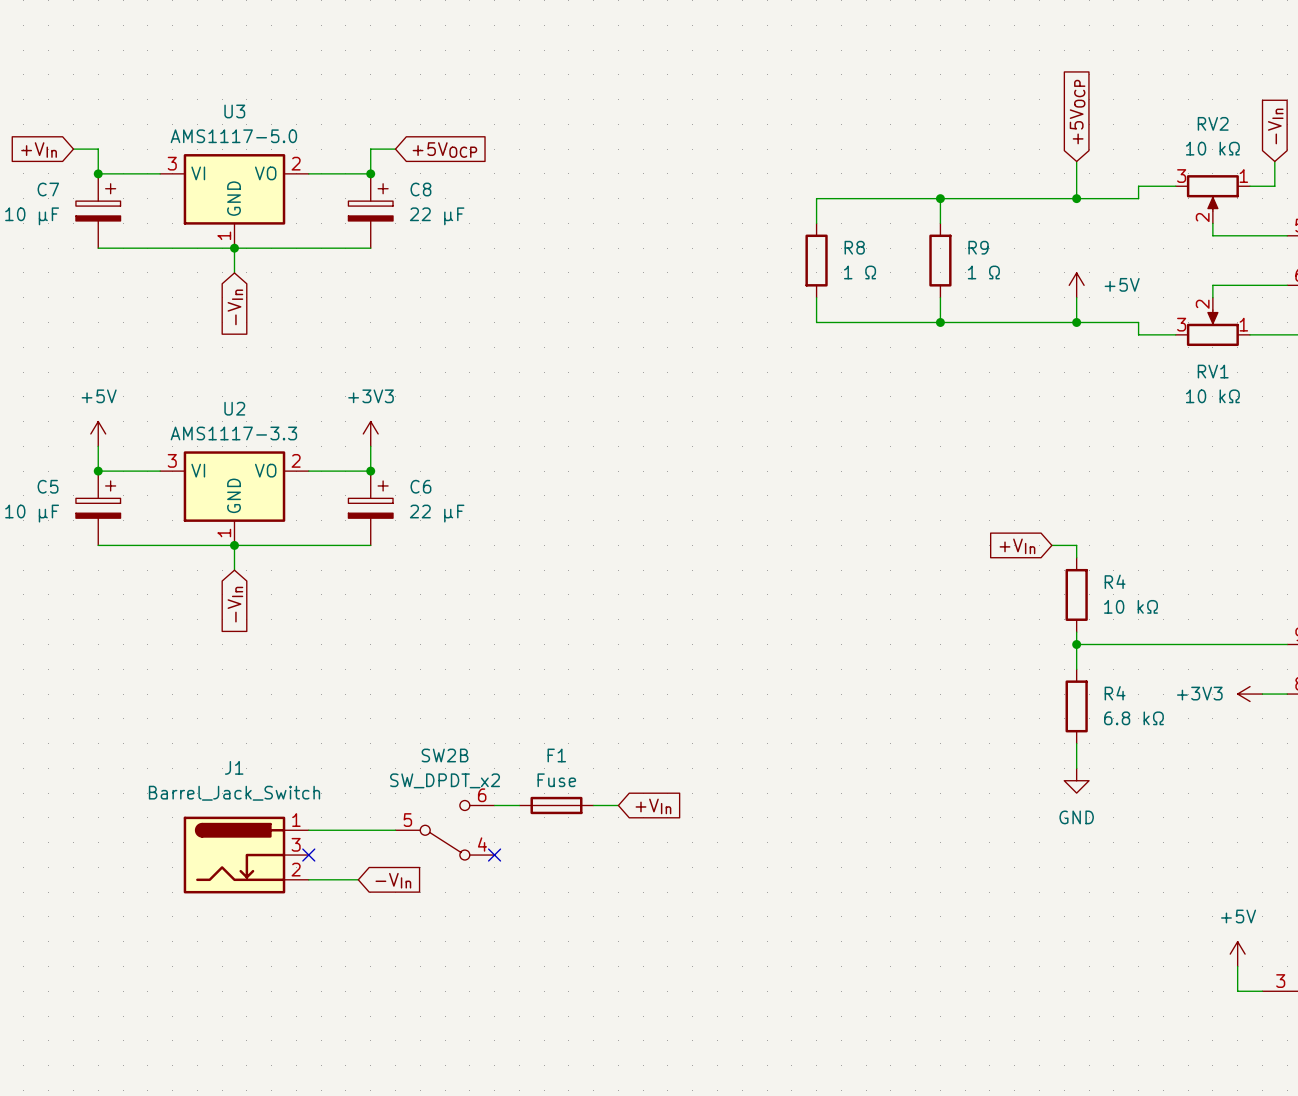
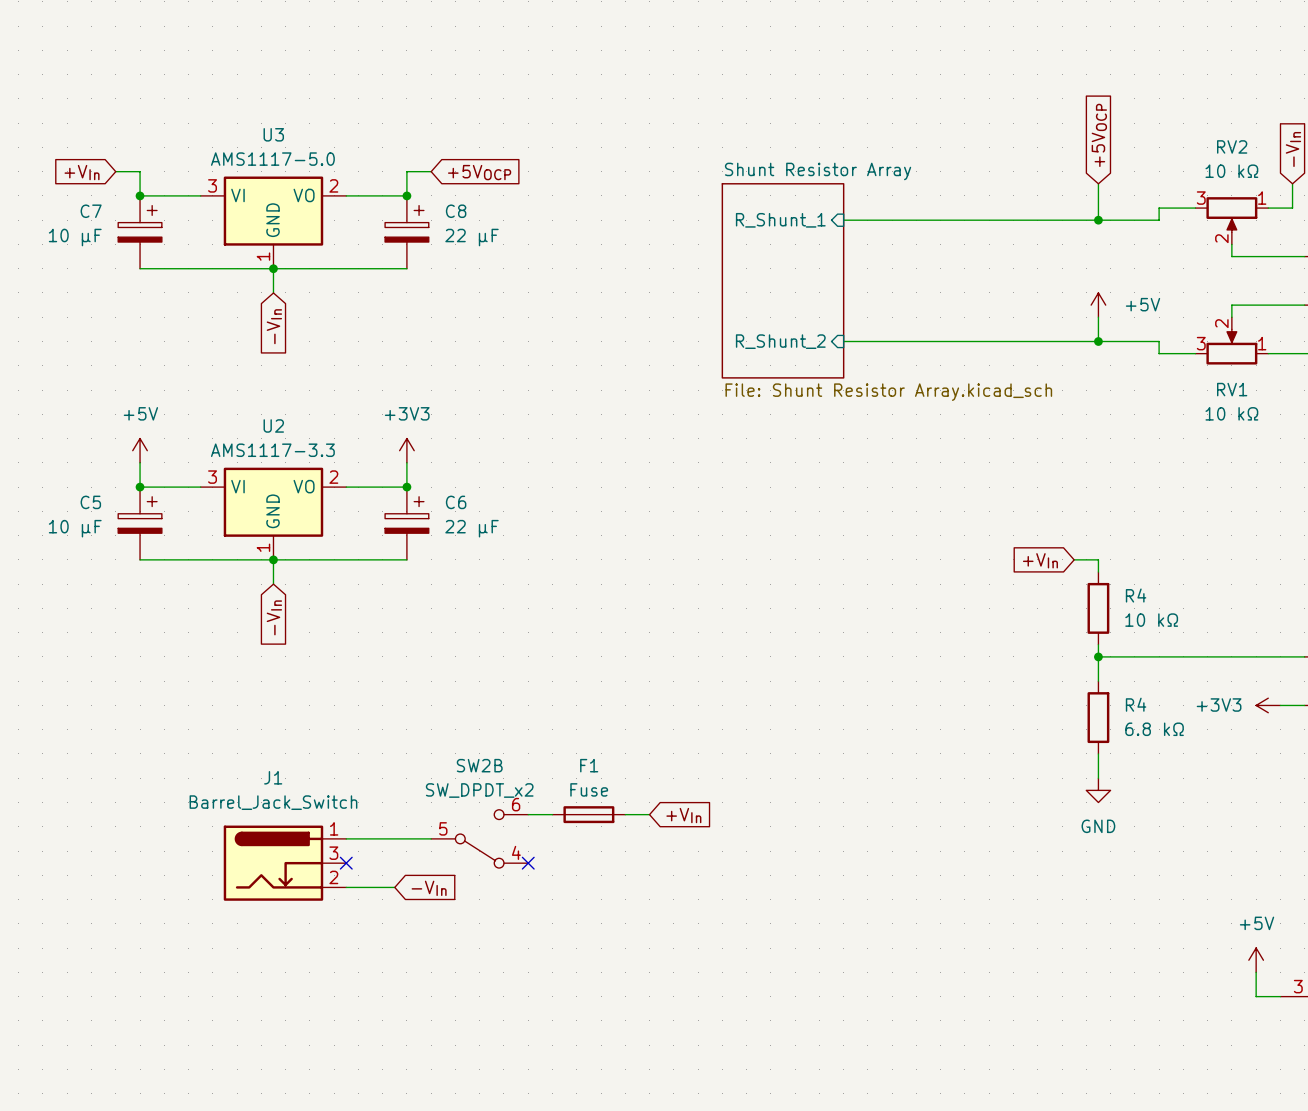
sheet pin: none -> R_Shunt_1 (780, 220)
wire: (940, 198) (940, 223) -> none
junction: (940, 198) -> none
sheet Shunt Resistor Array: none -> File: Shunt Resistor Array.kicad_sch (783, 280)
R8: 1 Ω (816, 260) -> none
R9: 1 Ω (940, 260) -> none
wire: (940, 297) (940, 322) -> none
sheet pin: none -> R_Shunt_2 (780, 341)
junction: (940, 322) -> none

